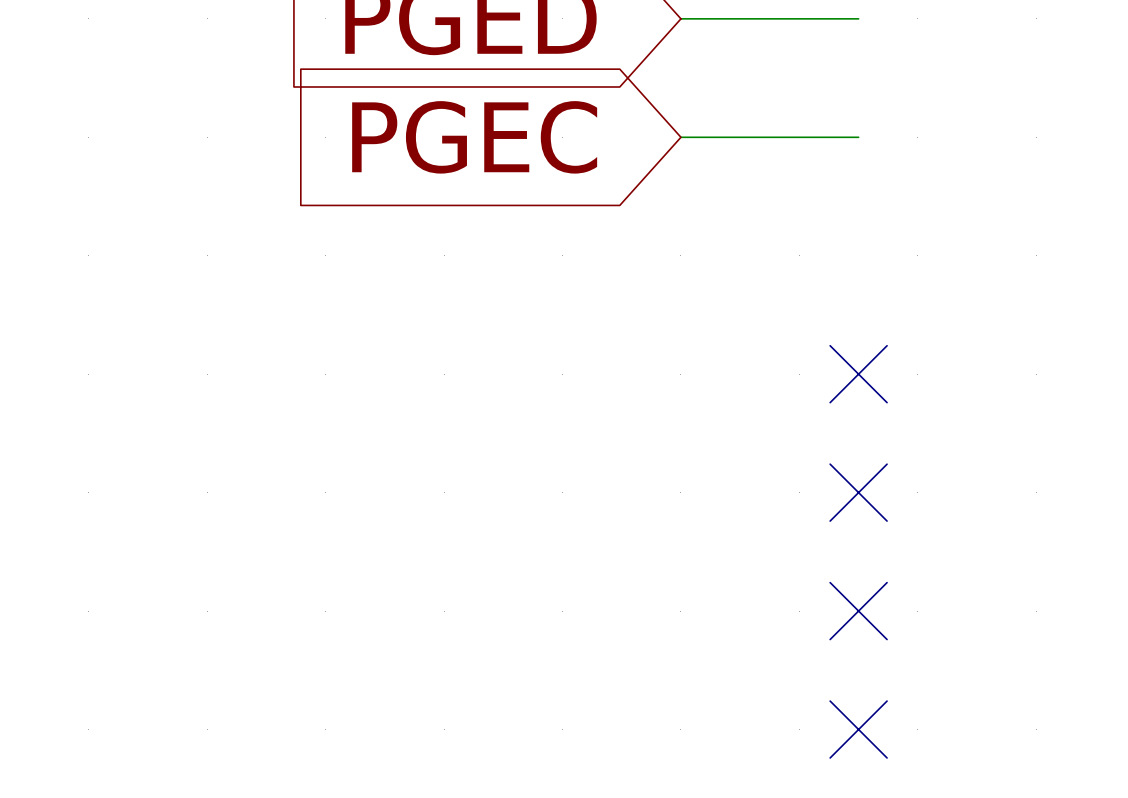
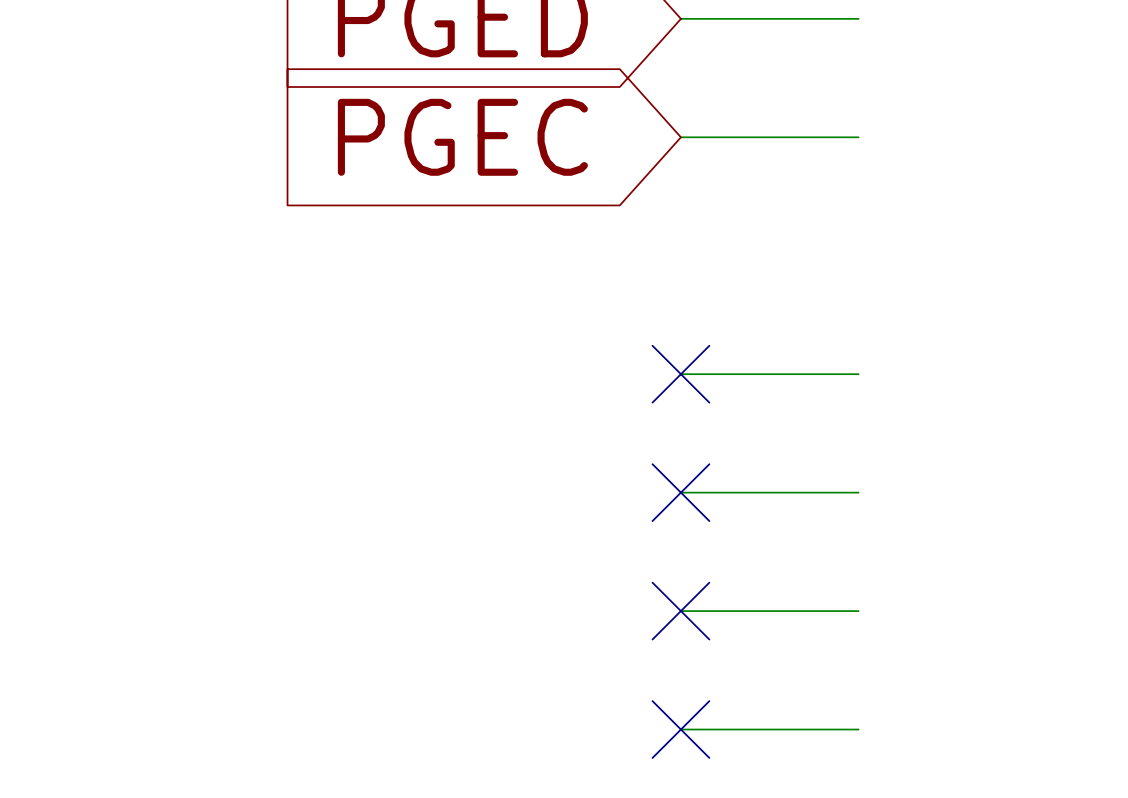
wire: none -> (680, 374) (858, 374)
no-connect mark: none -> (680, 374)
no-connect mark: (858, 374) -> none
wire: none -> (680, 492) (858, 492)
no-connect mark: none -> (680, 492)
no-connect mark: (858, 492) -> none
wire: none -> (680, 611) (858, 611)
no-connect mark: none -> (680, 611)
no-connect mark: (858, 611) -> none
wire: none -> (680, 729) (858, 729)
no-connect mark: none -> (680, 729)
no-connect mark: (858, 729) -> none

